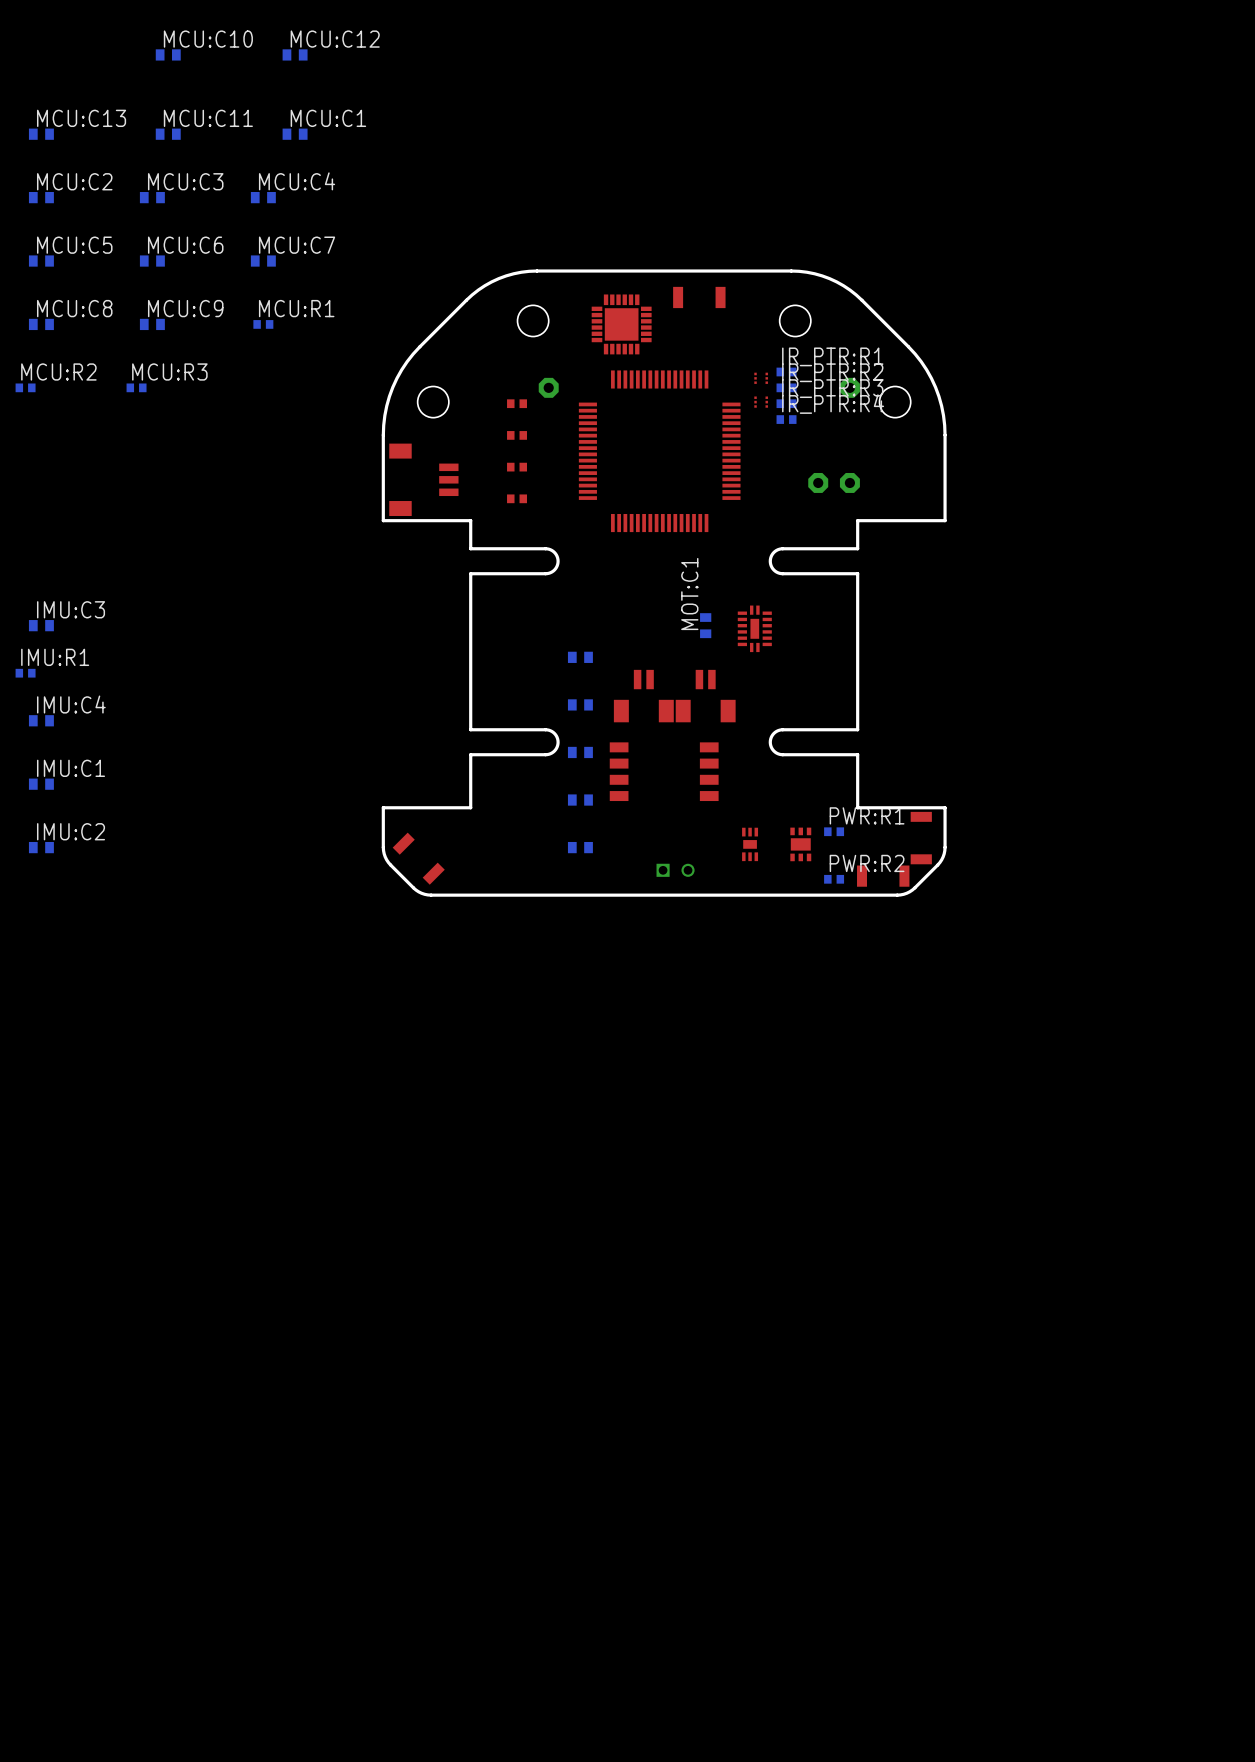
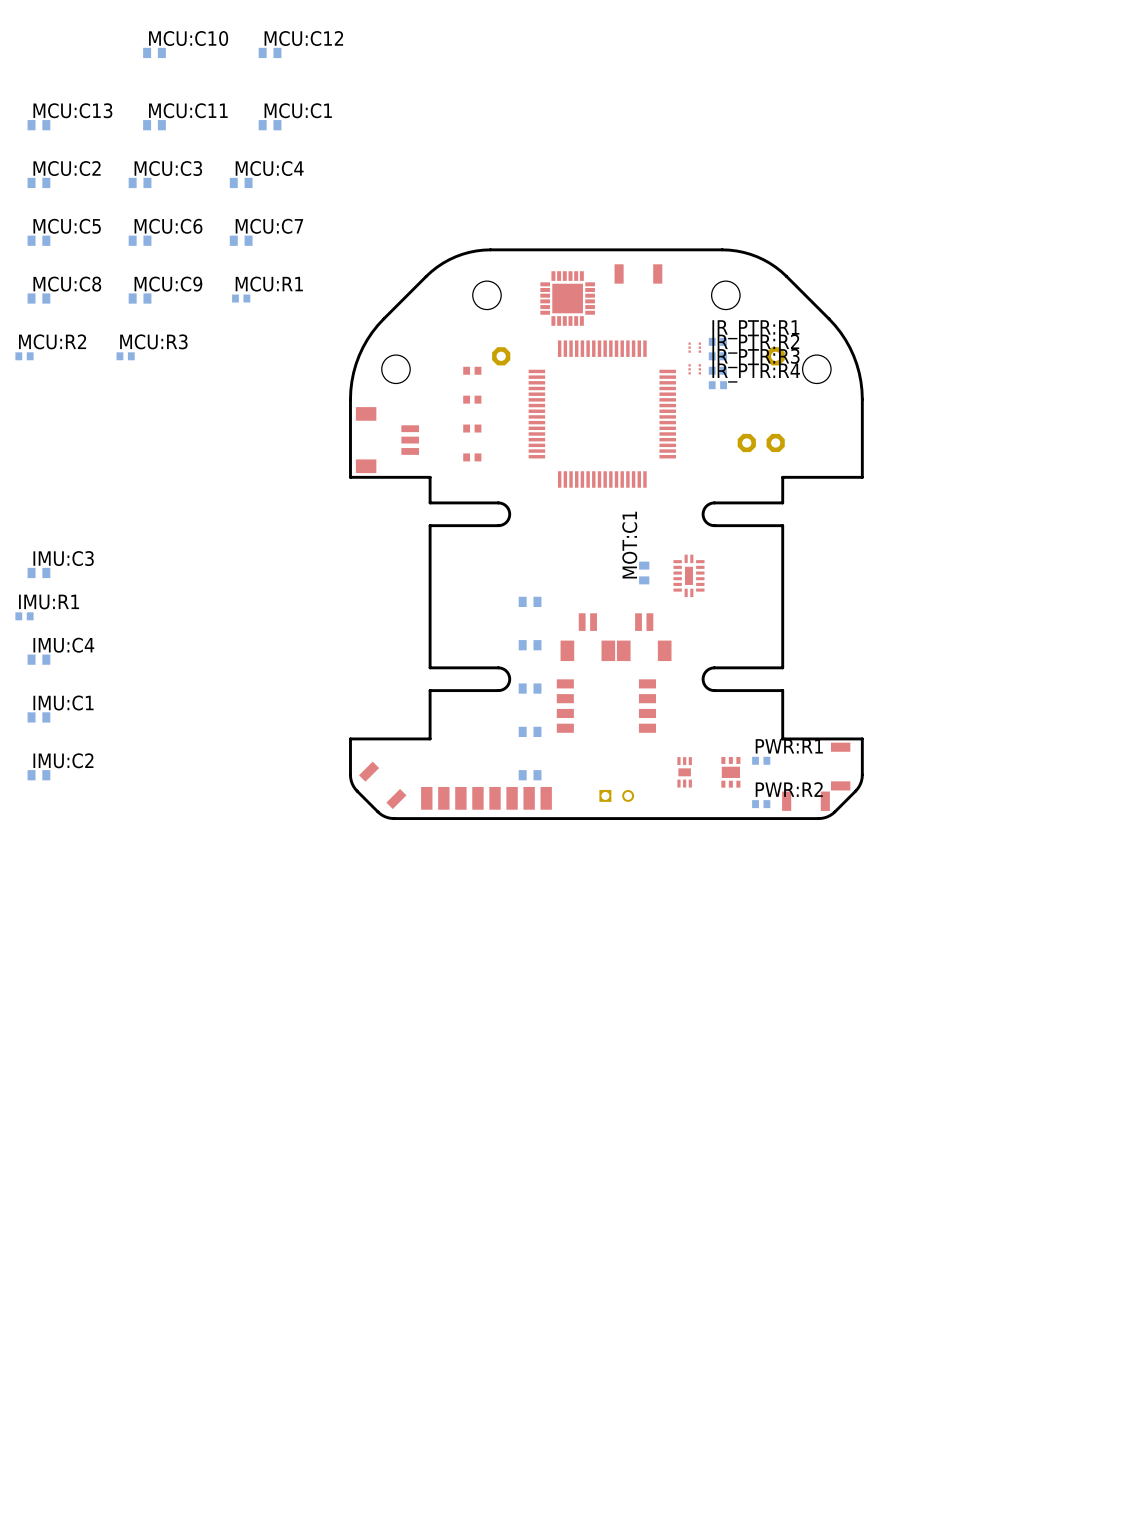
part: none -> (486, 798)

